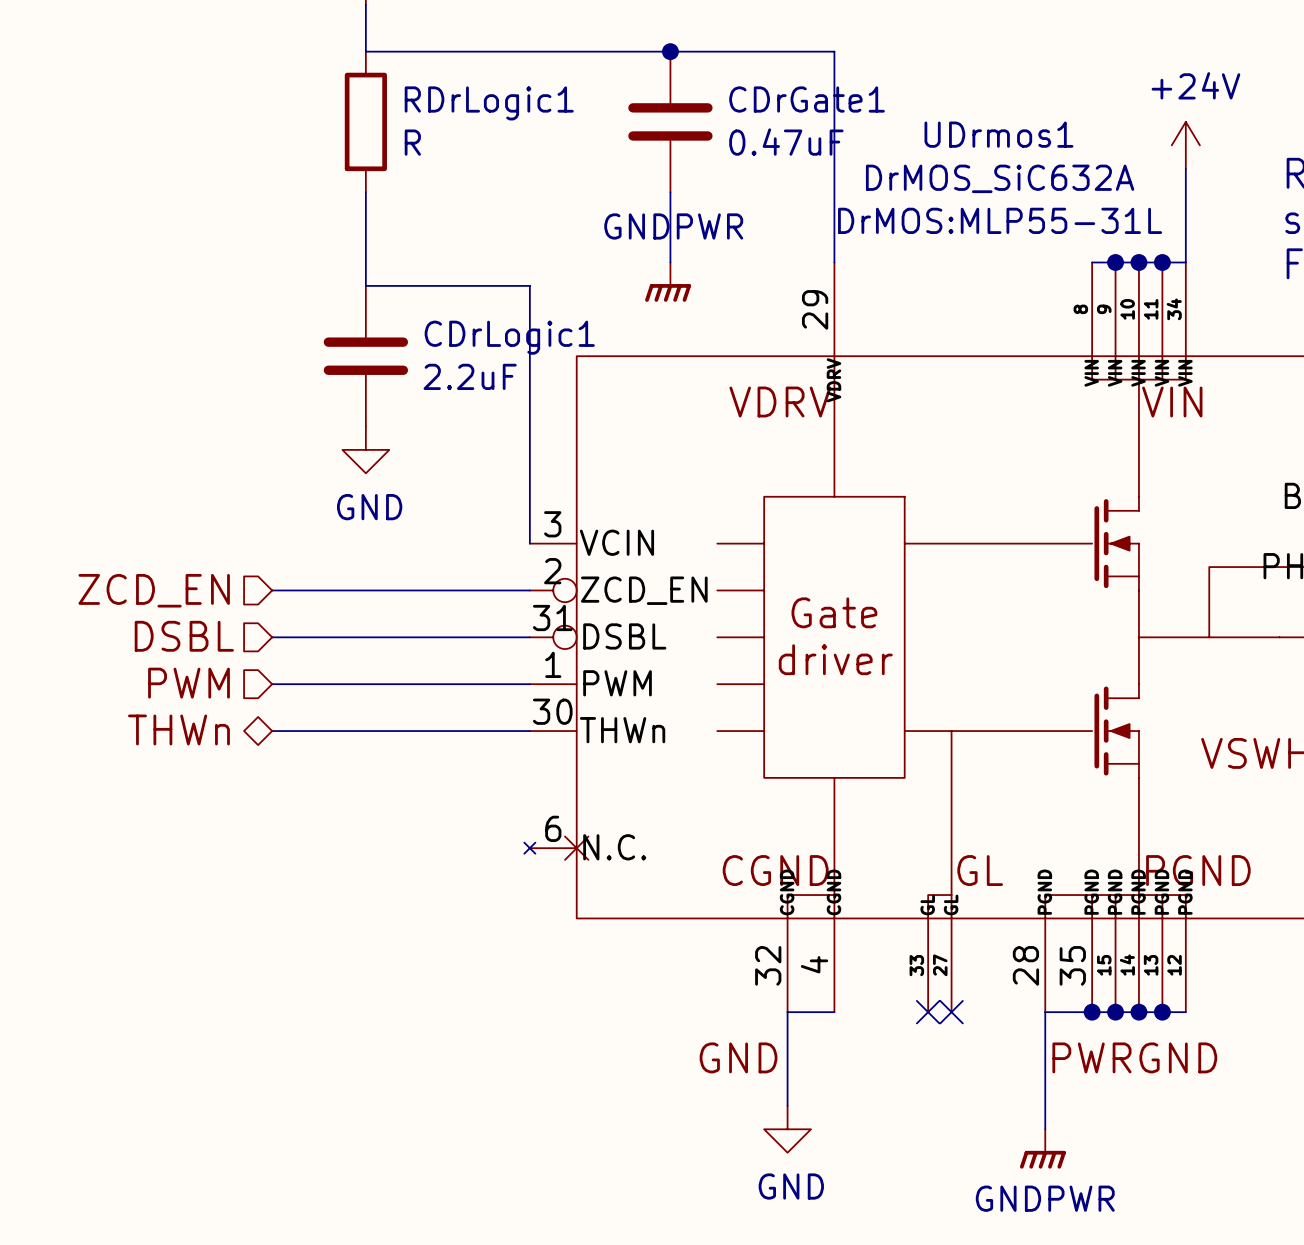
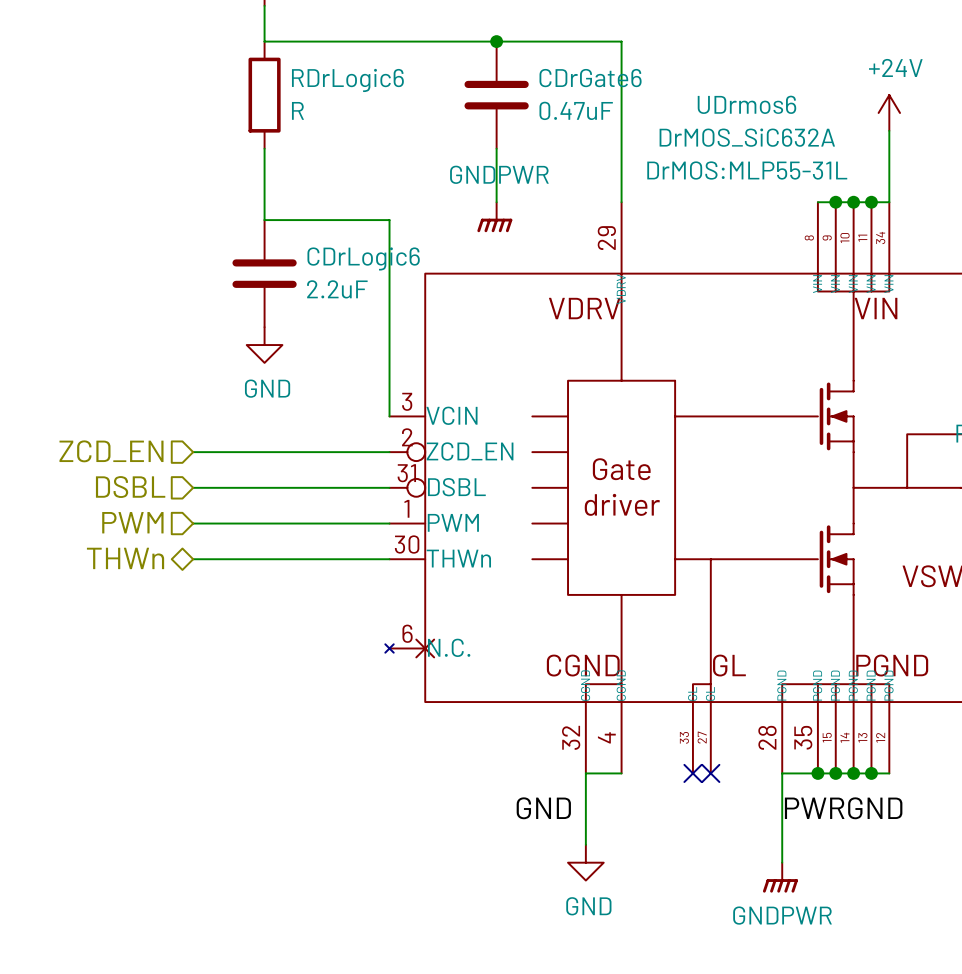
CDrGate1 name: CDrGate1 (807, 99) -> CDrGate6 (590, 78)
RDrLogic1 name: RDrLogic1 (489, 103) -> RDrLogic6 (347, 80)
UDrmos1 name: UDrmos1 (998, 134) -> UDrmos6 (746, 104)
CDrLogic1 name: CDrLogic1 (509, 337) -> CDrLogic6 (363, 258)

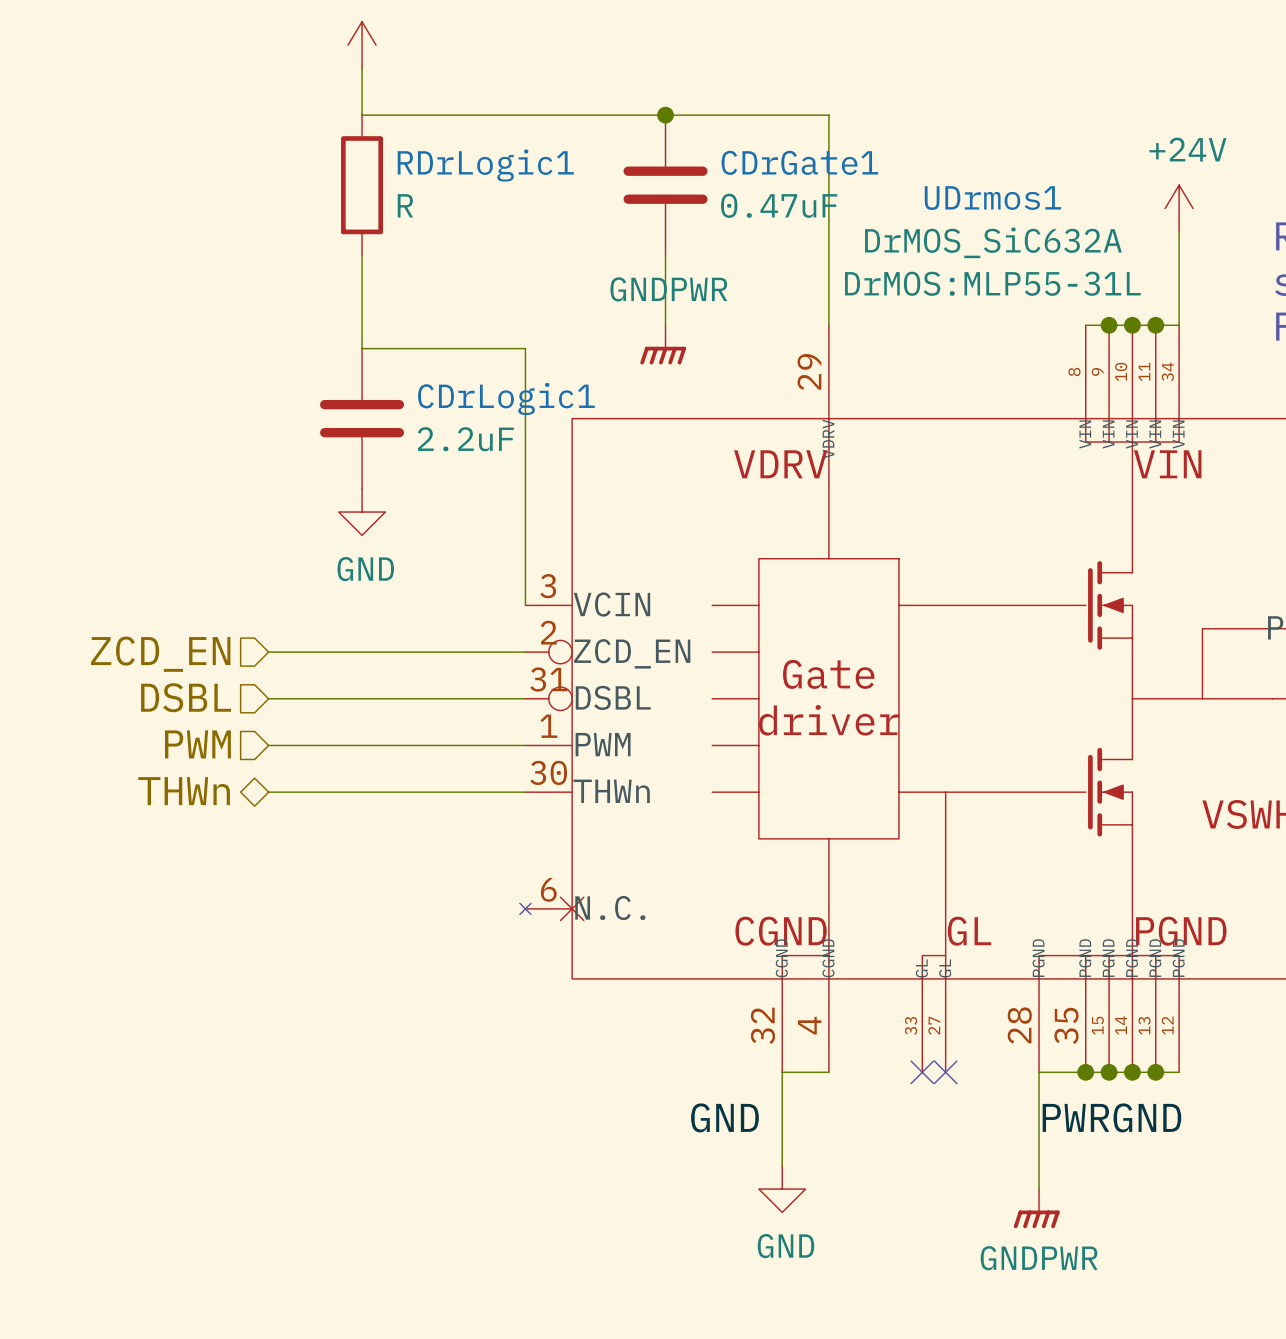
CDrGate6 name: CDrGate6 (590, 78) -> CDrGate1 (799, 162)
RDrLogic6 name: RDrLogic6 (347, 80) -> RDrLogic1 (485, 165)
UDrmos6 name: UDrmos6 (746, 104) -> UDrmos1 (992, 198)
CDrLogic6 name: CDrLogic6 (363, 258) -> CDrLogic1 (506, 399)

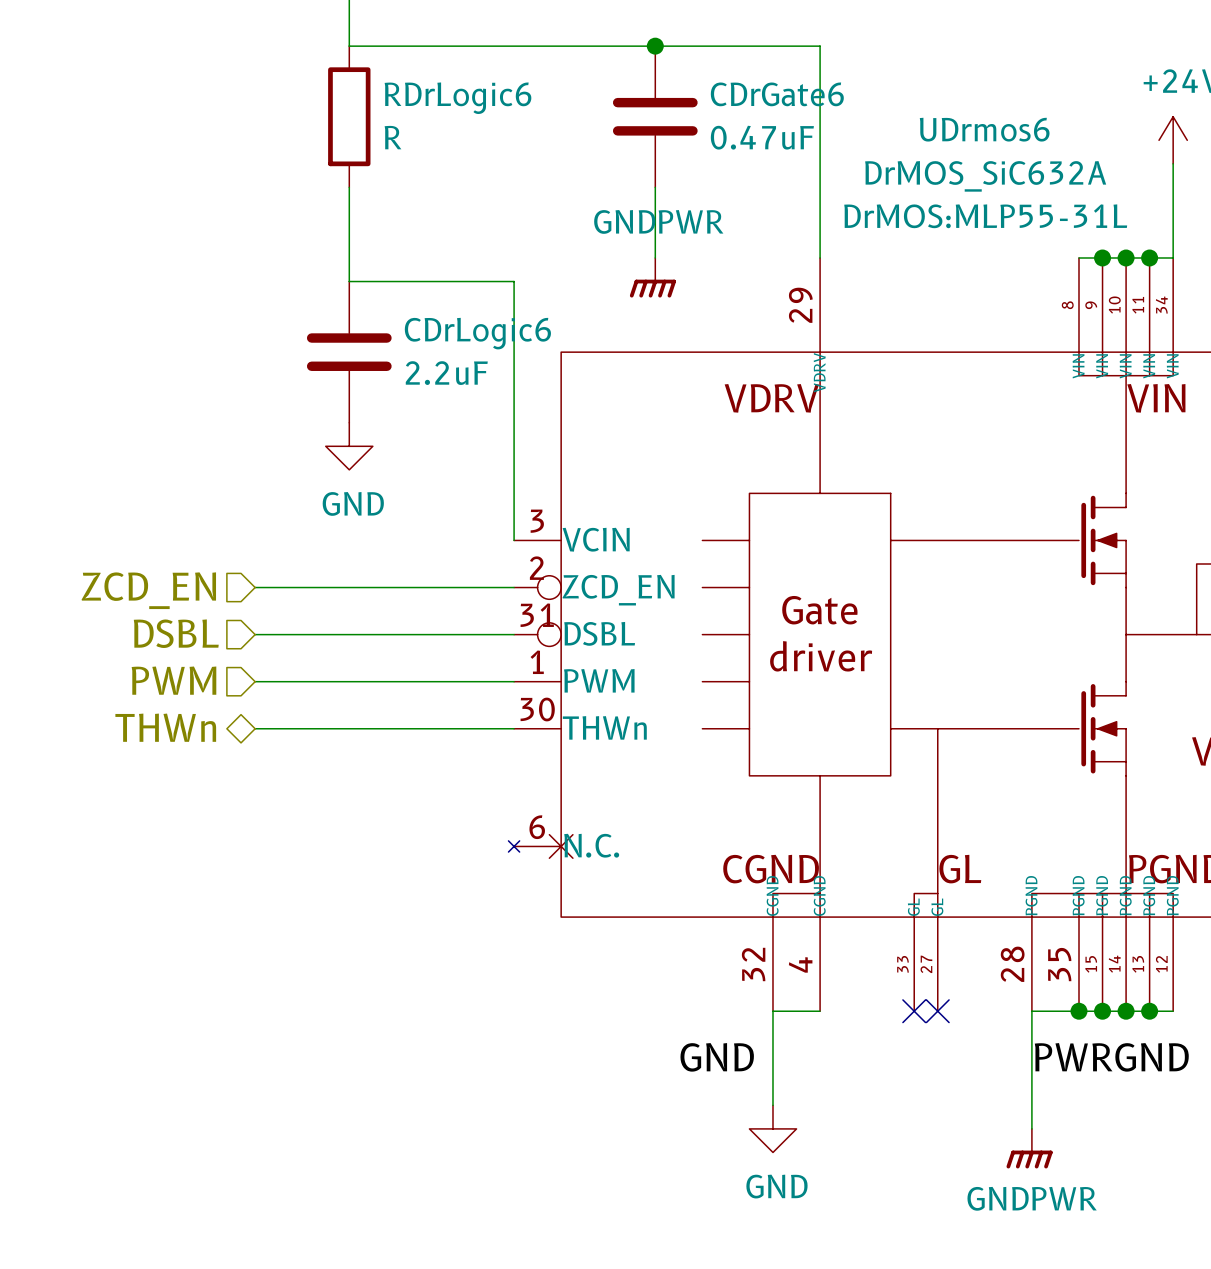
CDrGate1 name: CDrGate1 (799, 162) -> CDrGate6 (777, 94)
RDrLogic1 name: RDrLogic1 (485, 165) -> RDrLogic6 (457, 98)
UDrmos1 name: UDrmos1 (992, 198) -> UDrmos6 (984, 129)
CDrLogic1 name: CDrLogic1 (506, 399) -> CDrLogic6 (477, 333)

